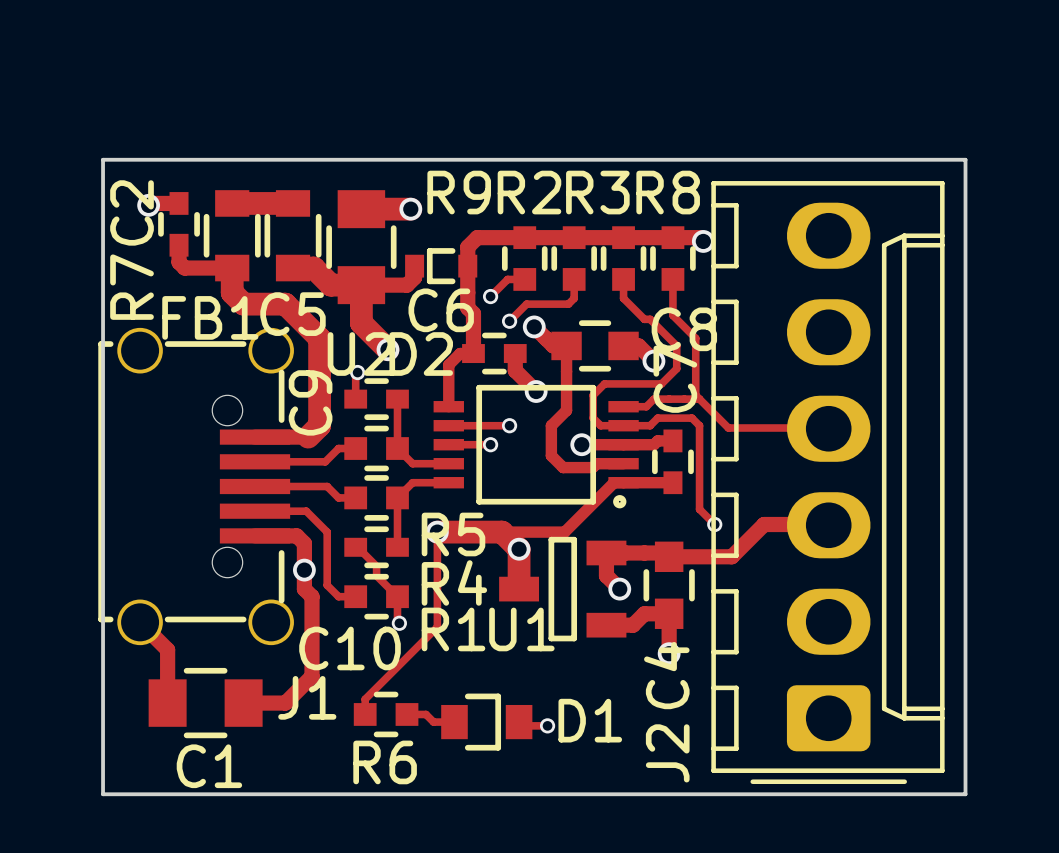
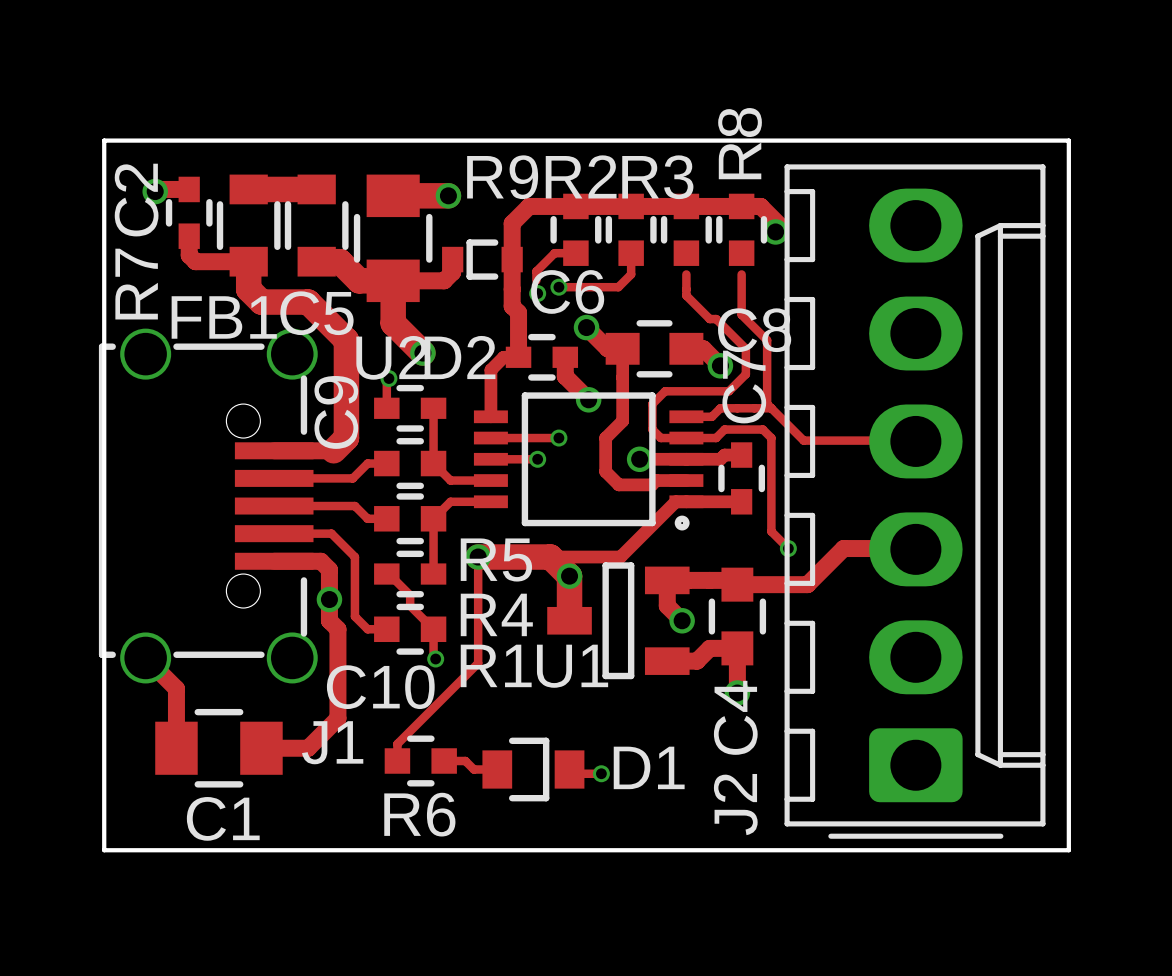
R8 name rotation: 0° (668, 192) -> 90° counterclockwise (740, 143)
track: (703, 241) (699, 237) (477, 237) (467, 247) -> (779, 225) (760, 206) (529, 206) (512, 223) (512, 238)
R9 position: (524, 258) -> (575, 229)
R2 position: (574, 258) -> (631, 229)
R3 position: (623, 258) -> (686, 229)
R8 position: (672, 258) -> (741, 229)
track: none -> (575, 253) (554, 253) (536, 271) (536, 280)
track: none -> (631, 253) (631, 274) (618, 287) (558, 287)
track: (524, 279) (507, 279) (490, 296) -> none
track: (574, 279) (574, 298) (568, 304) (526, 304) (509, 321) -> none
C6 name position: C6 (441, 310) -> C6 (567, 291)
via position: (509, 321) -> (558, 287)

